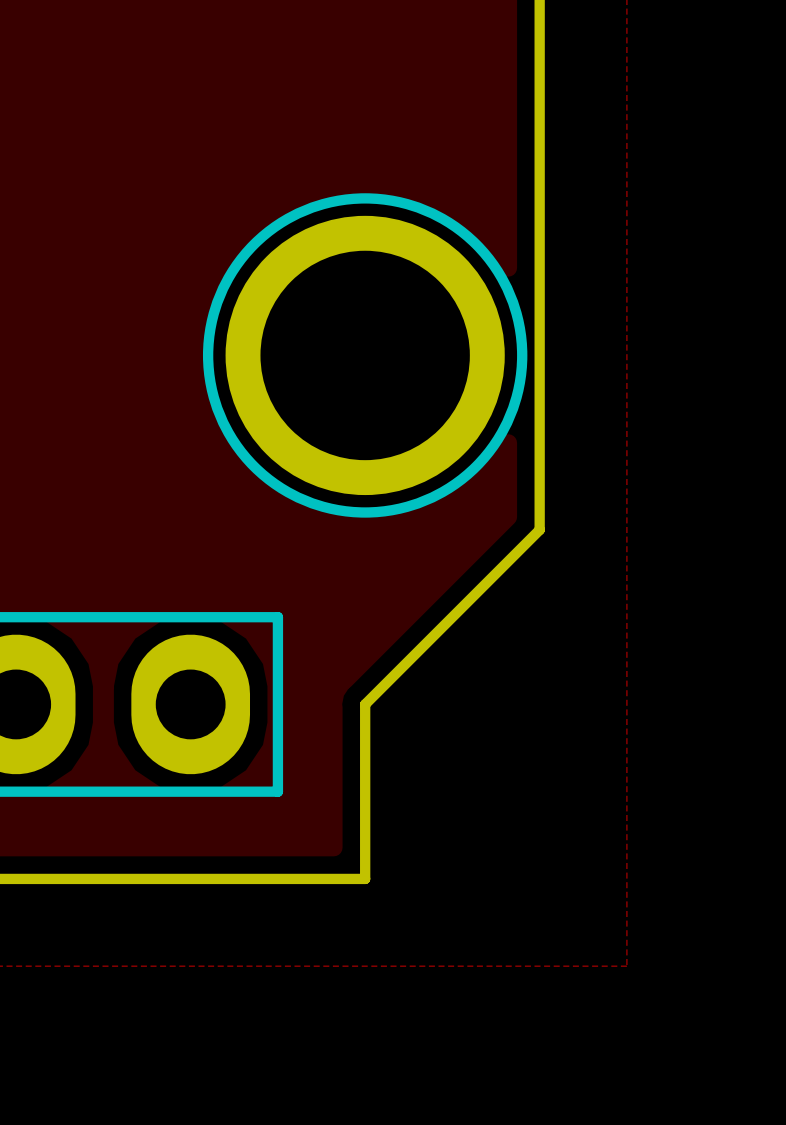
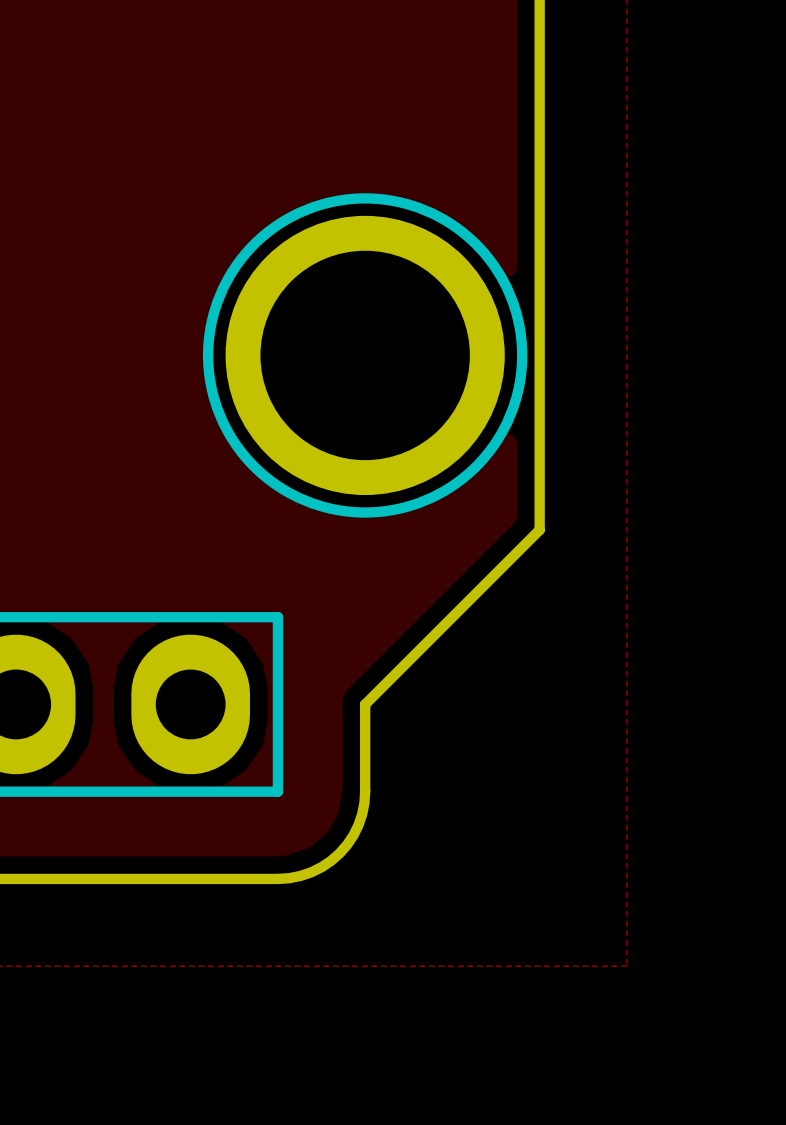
board edge: (365, 791) (365, 878) (277, 878) -> (365, 791) (358, 825) (339, 853) (311, 872) (277, 878)

